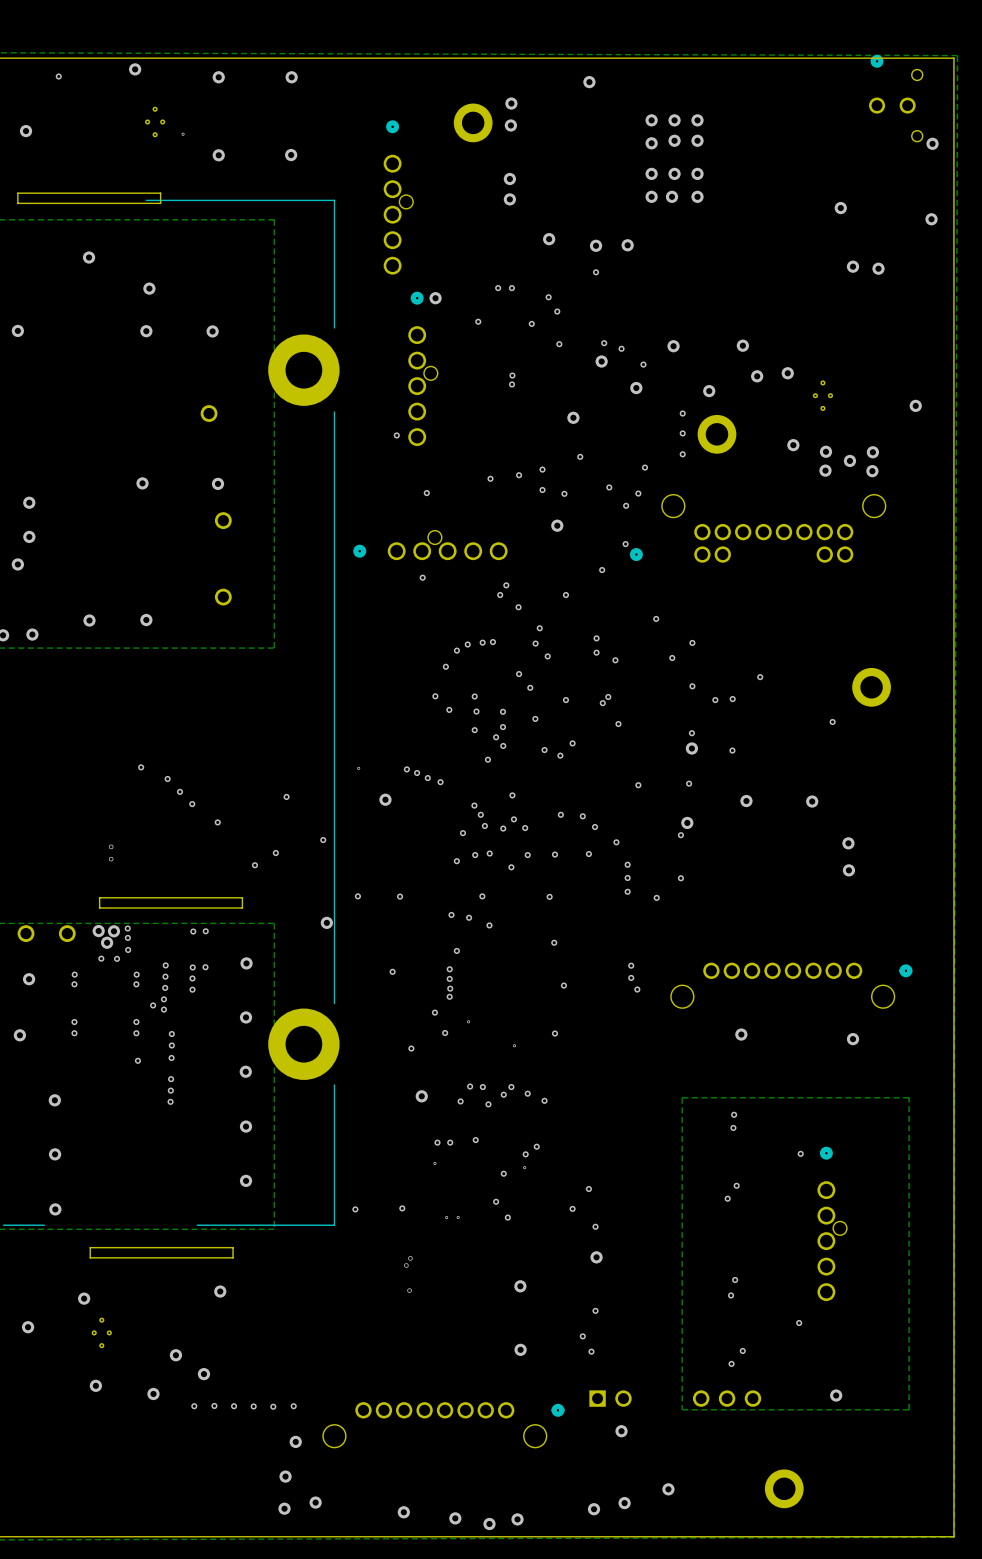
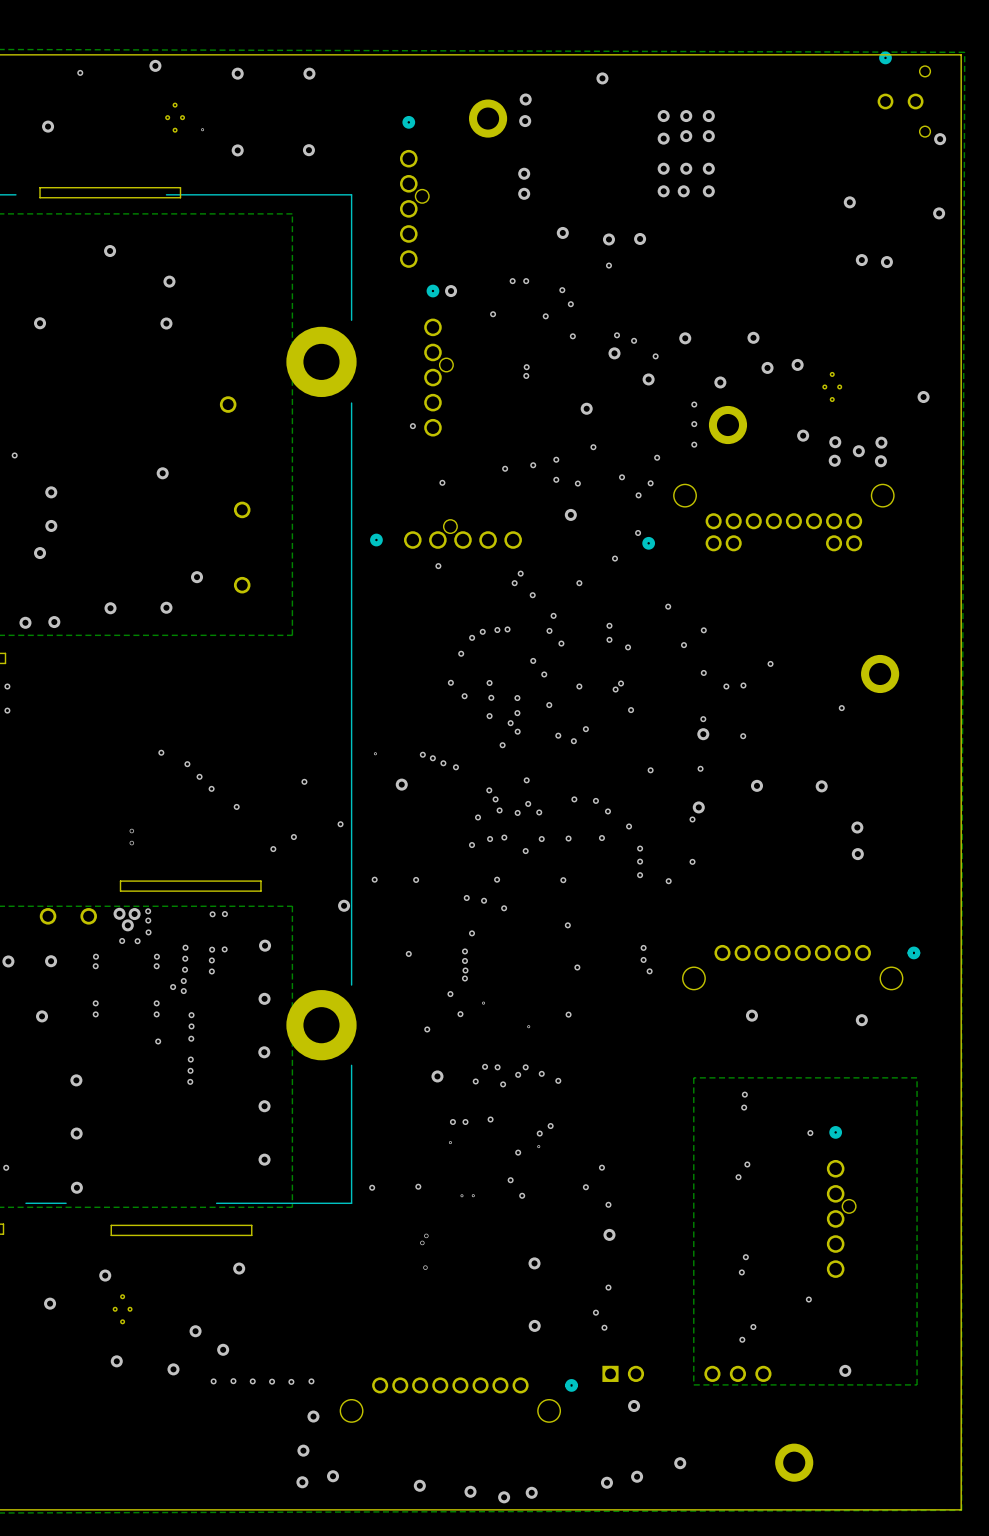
via: (212, 331) -> none
via: (217, 483) -> none
via: none -> (197, 577)

